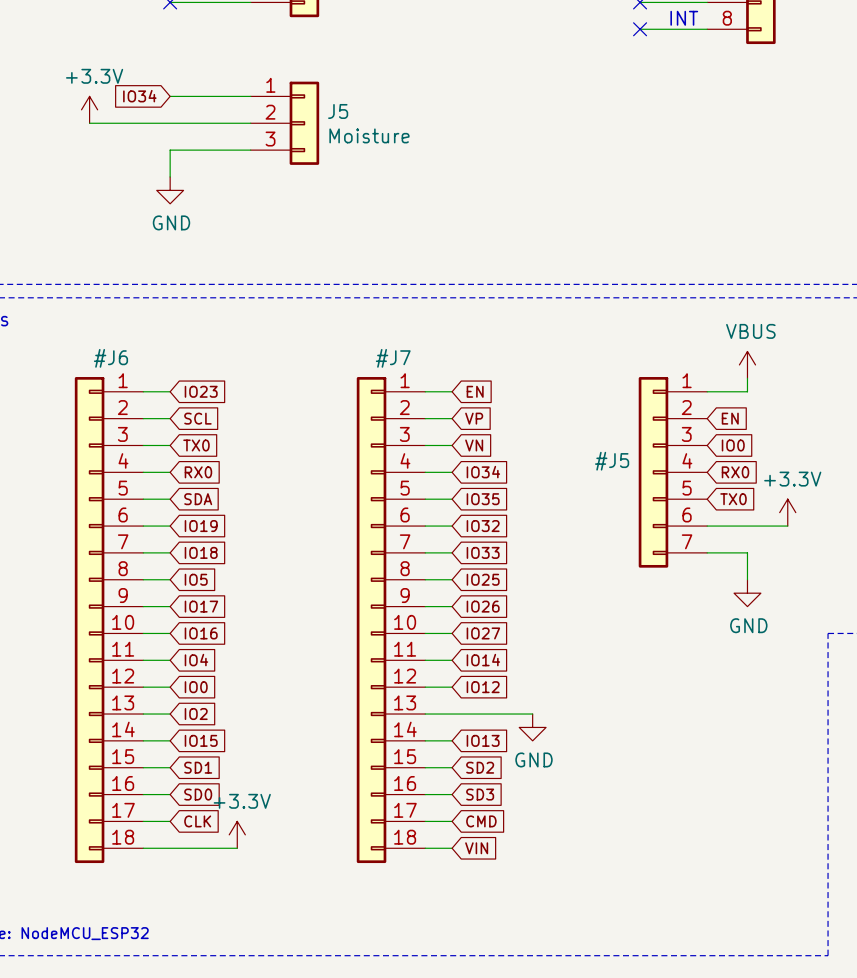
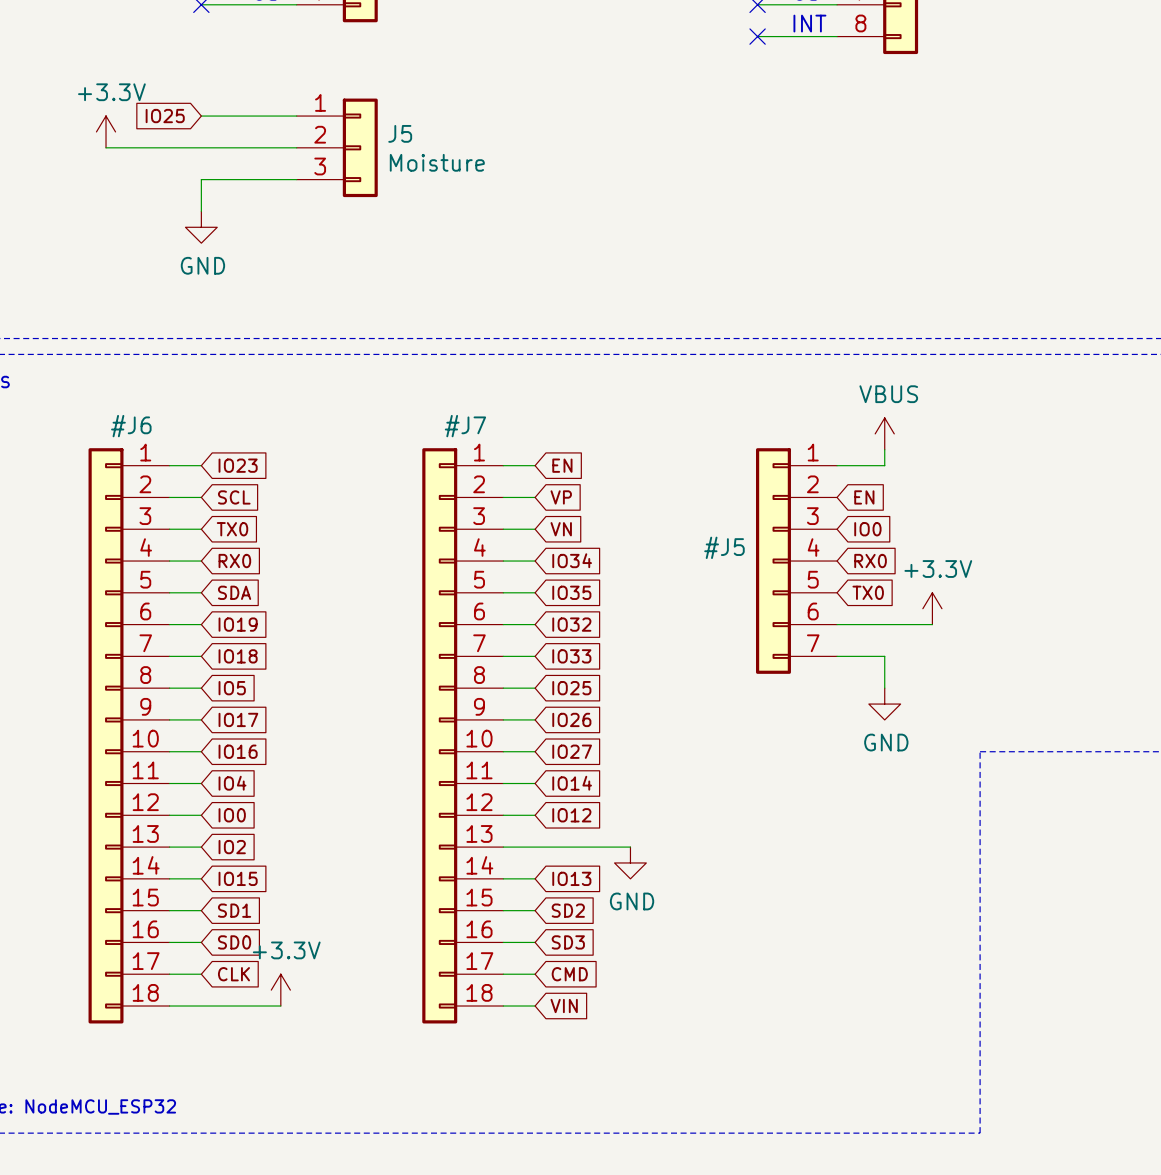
global label: IO34 (139, 96) -> IO25 (165, 116)

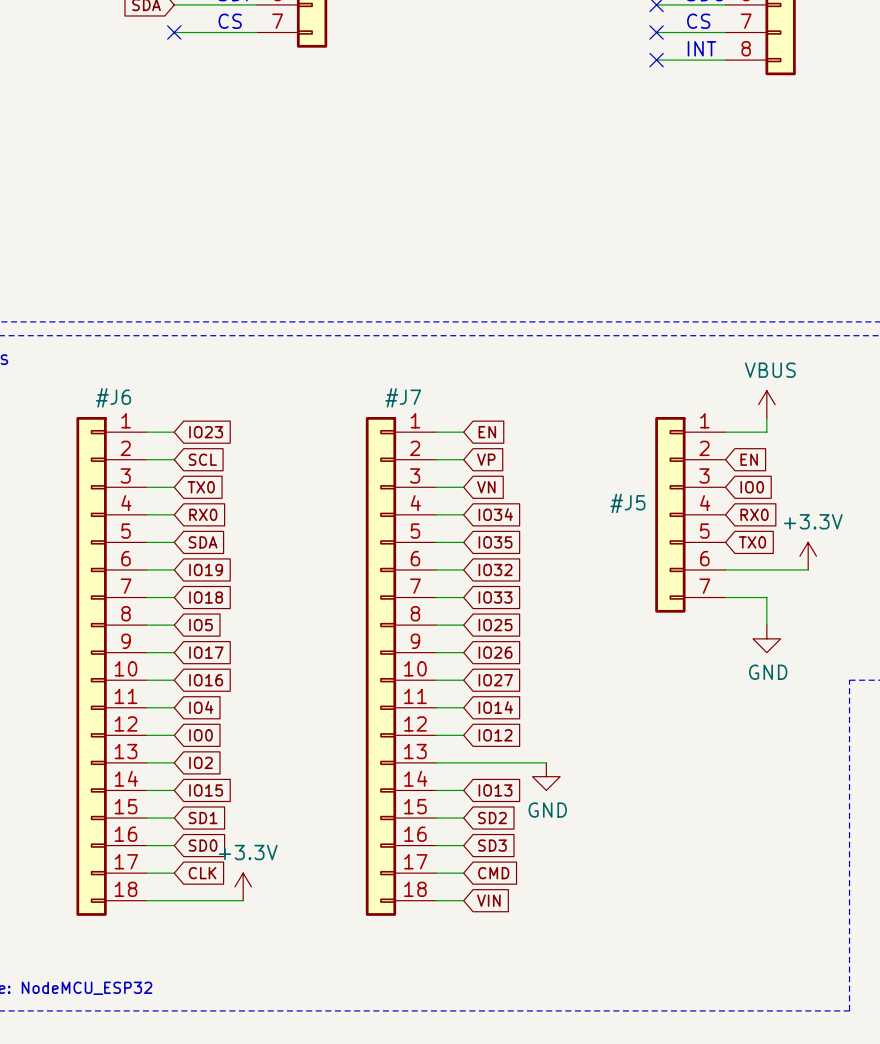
global label: IO25 (165, 116) -> none
wire: (201, 116) (296, 116) -> none
power symbol: +3.3V (106, 131) -> none
wire: (106, 147) (296, 147) -> none
J5: Moisture (337, 147) -> none
wire: (296, 179) (201, 179) (201, 211) -> none
power symbol: GND (201, 227) -> none

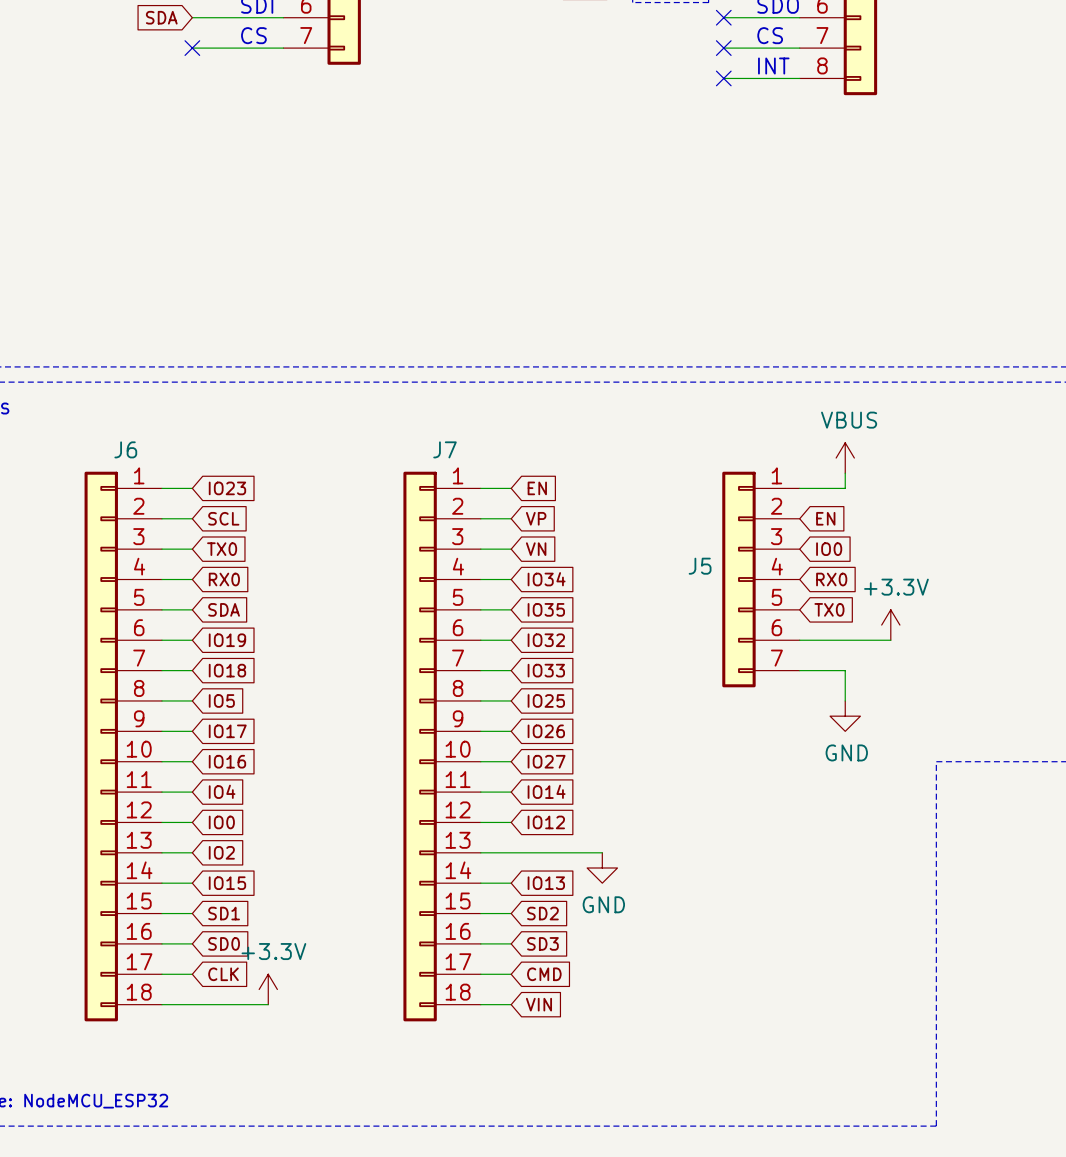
#J5: (690, 514) -> none
#J6: (111, 666) -> none
J6: none -> (123, 746)
#J7: (400, 666) -> none
J7: none -> (442, 746)

